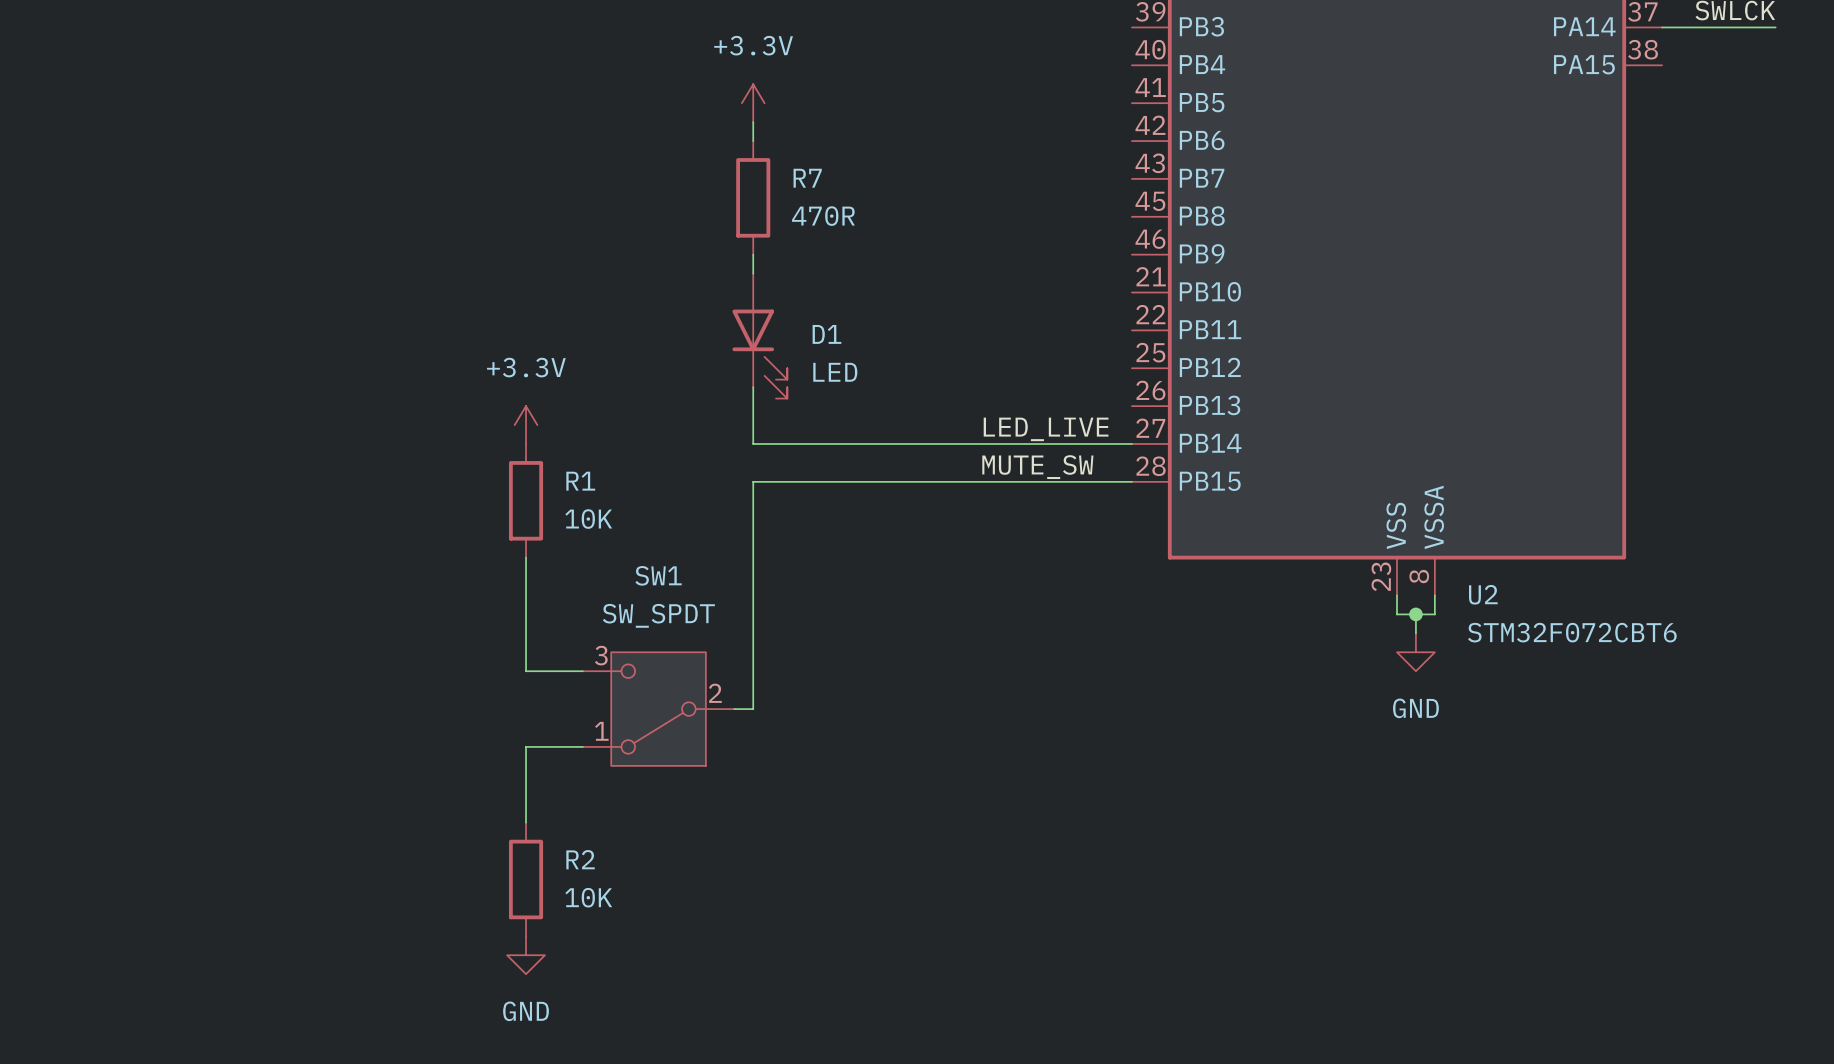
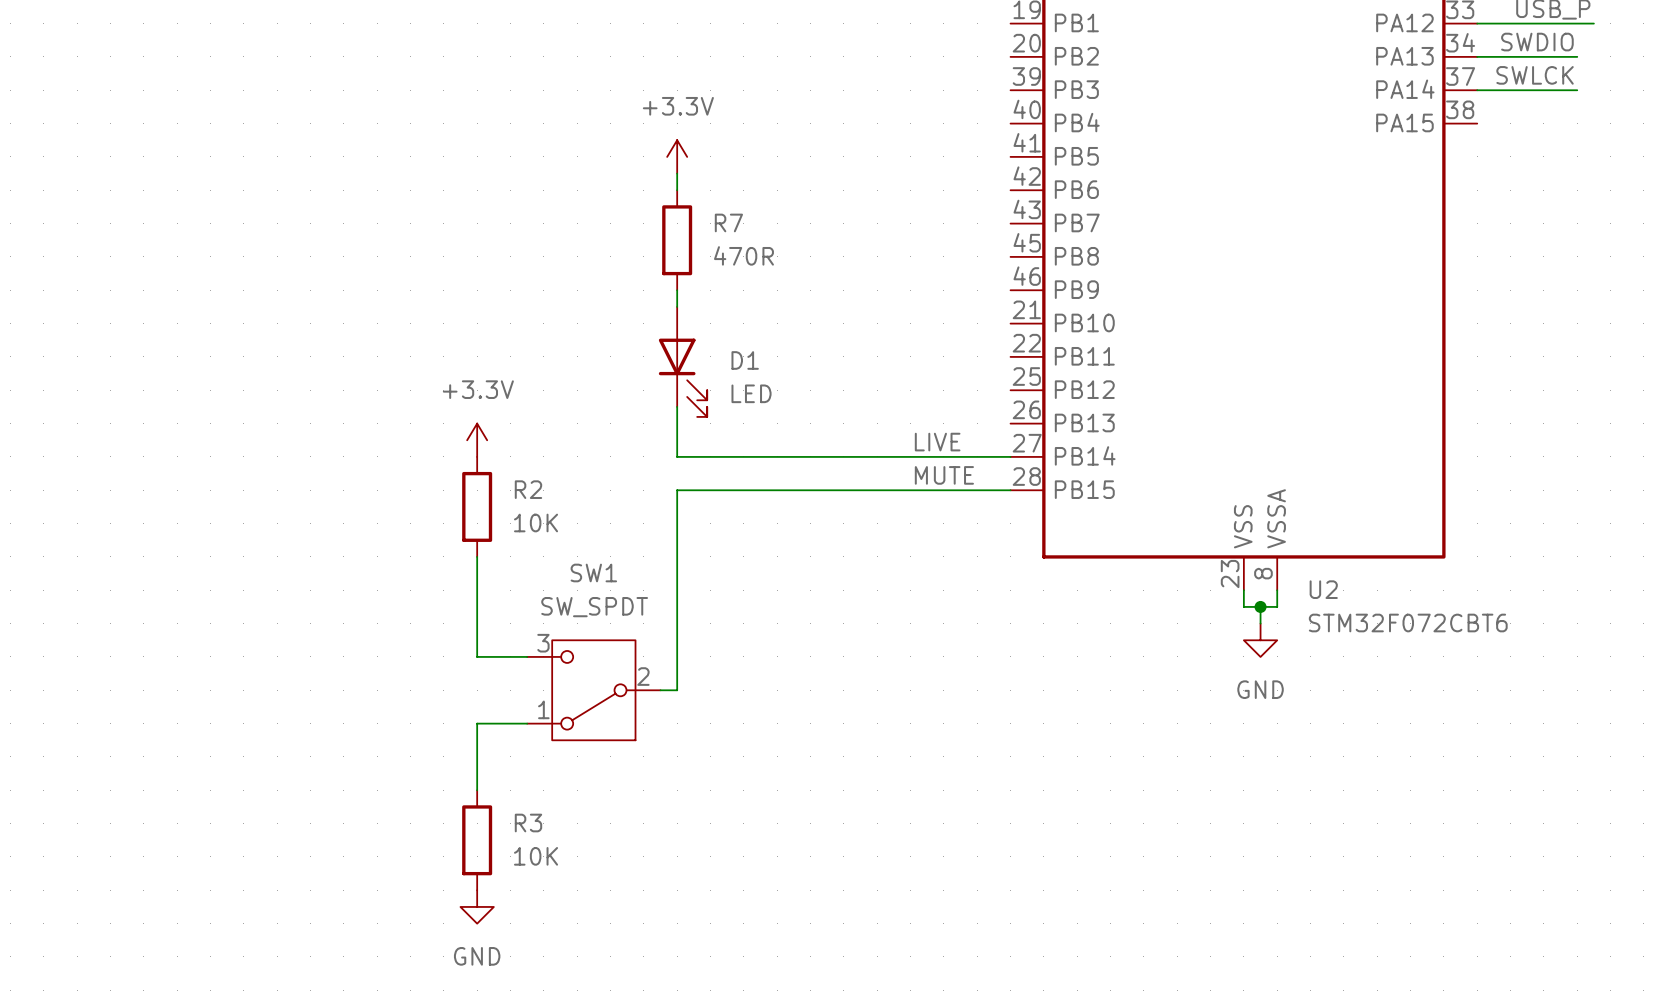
label: LED_LIVE (1046, 429) -> LIVE (937, 442)
label: MUTE_SW (1037, 467) -> MUTE (944, 475)
R1 name: R1 (580, 481) -> R2 (528, 489)
R2 name: R2 (580, 859) -> R3 (528, 823)

